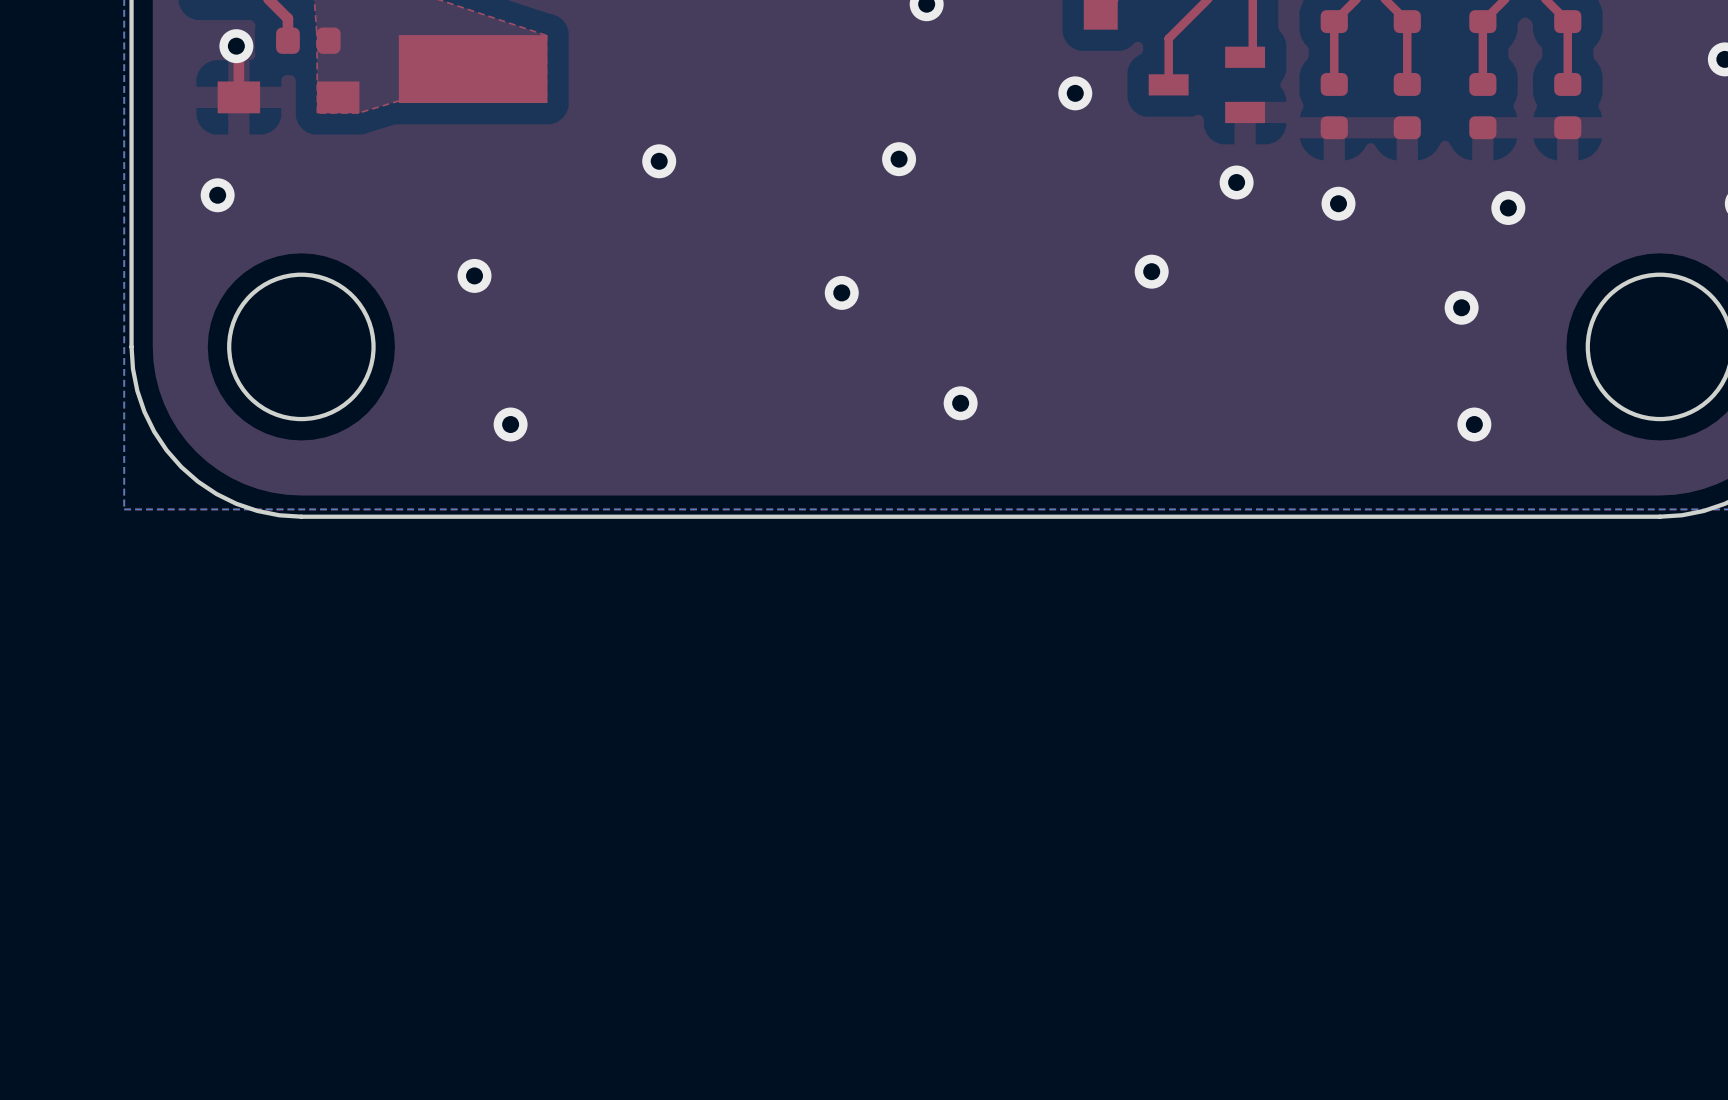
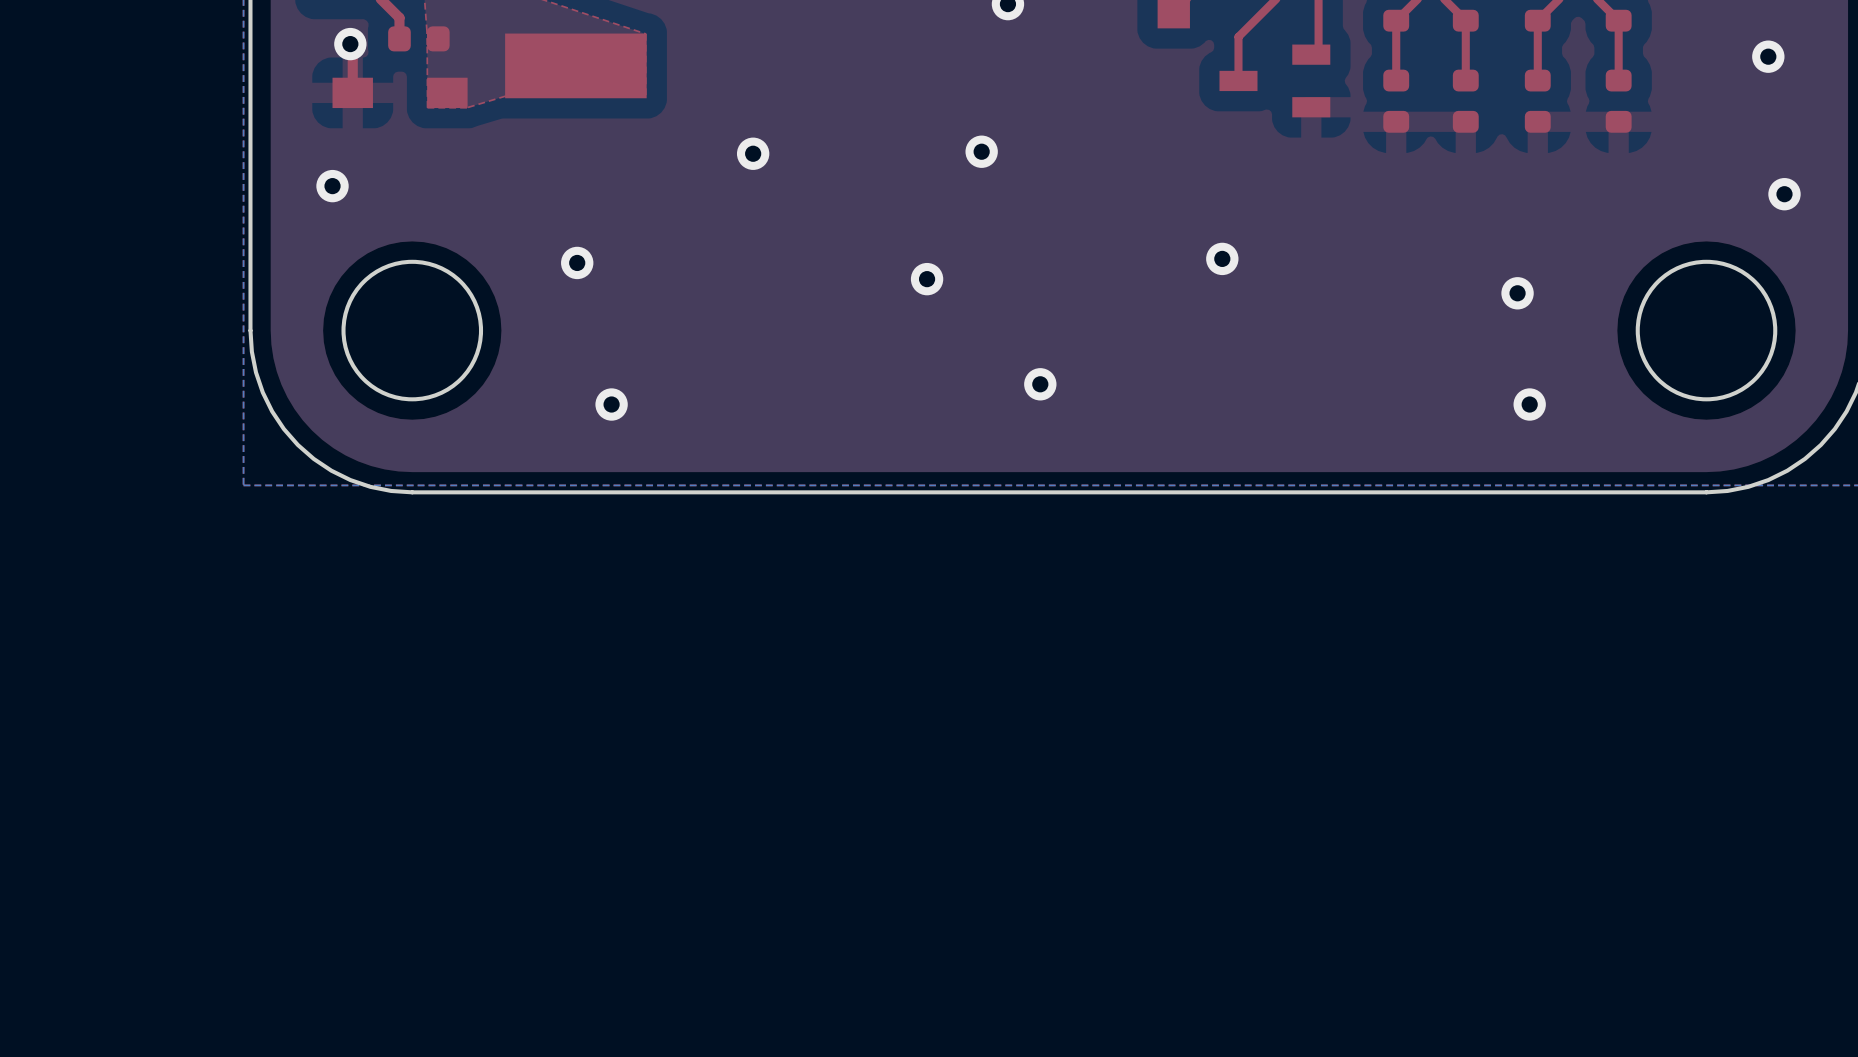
via: (1075, 93) -> none
via: (1236, 182) -> none
via: (1338, 203) -> none
via: (1508, 207) -> none

